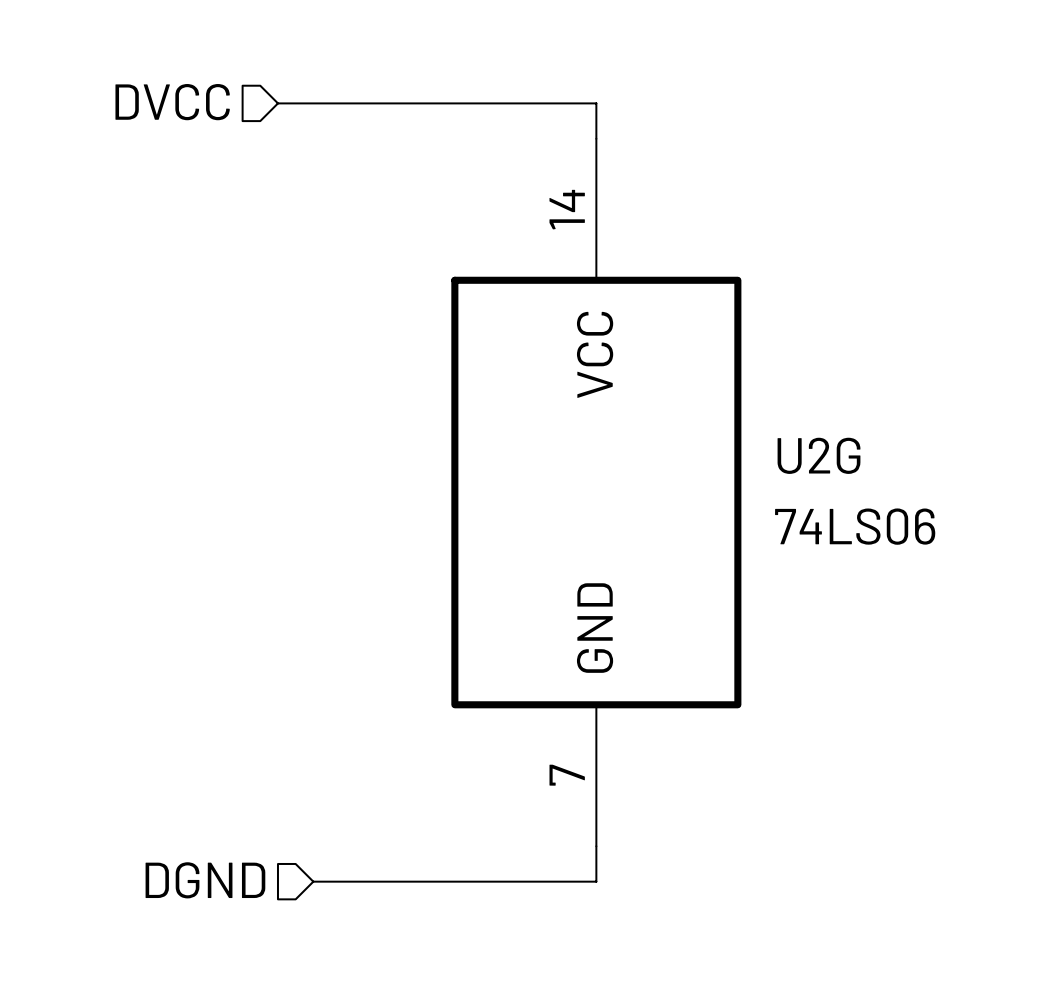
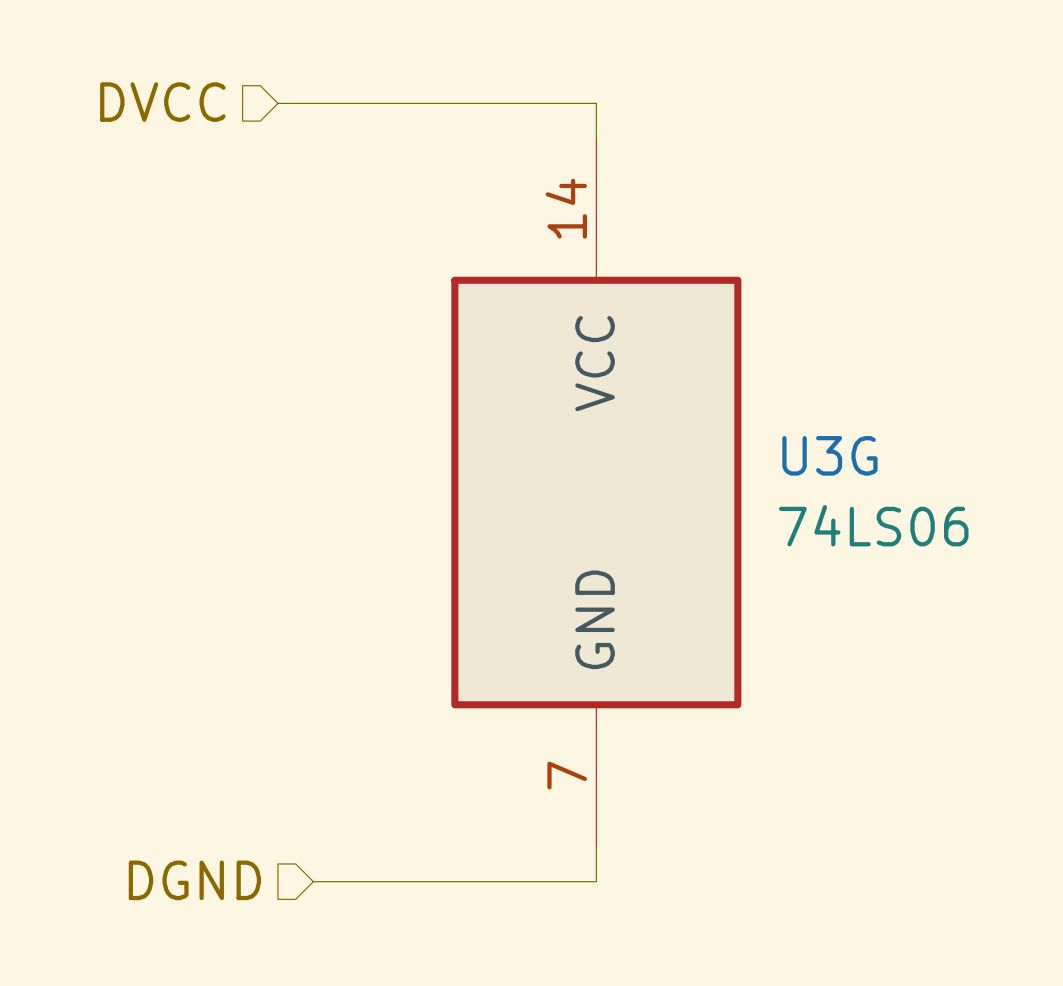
U2G name: U2G (818, 455) -> U3G (829, 455)

